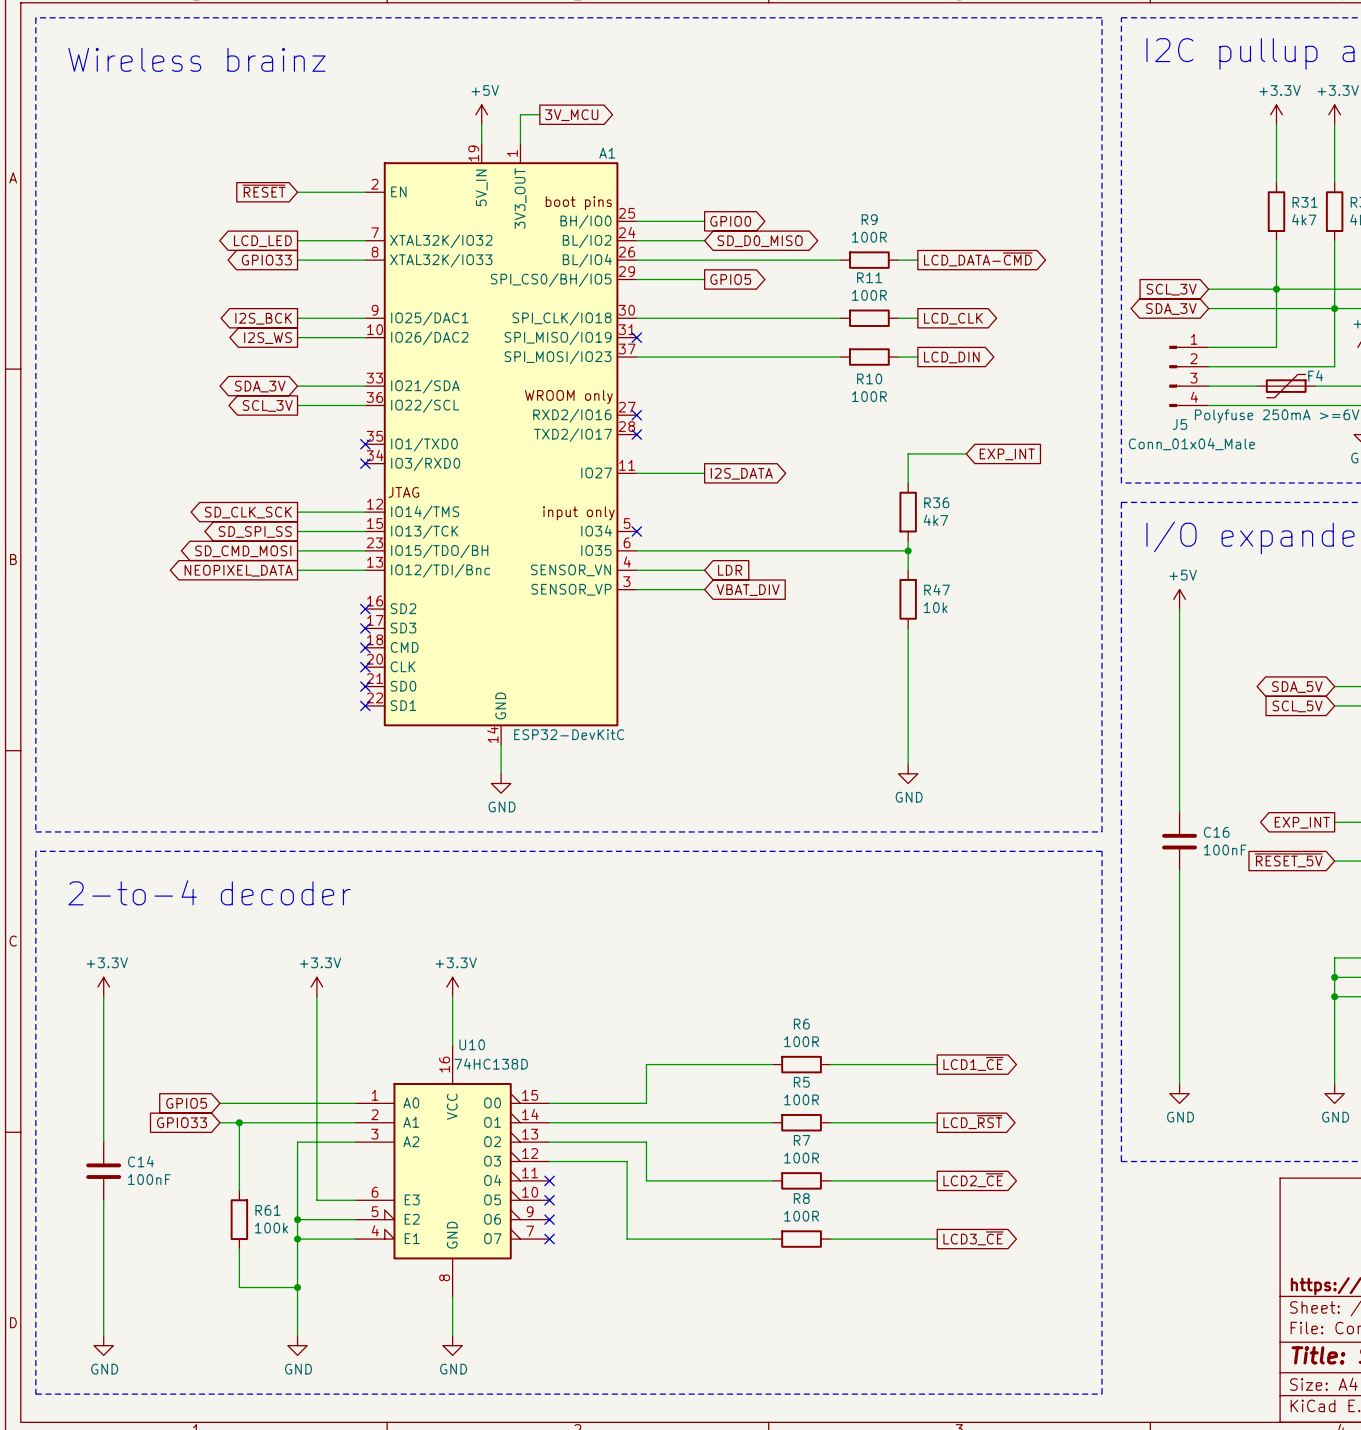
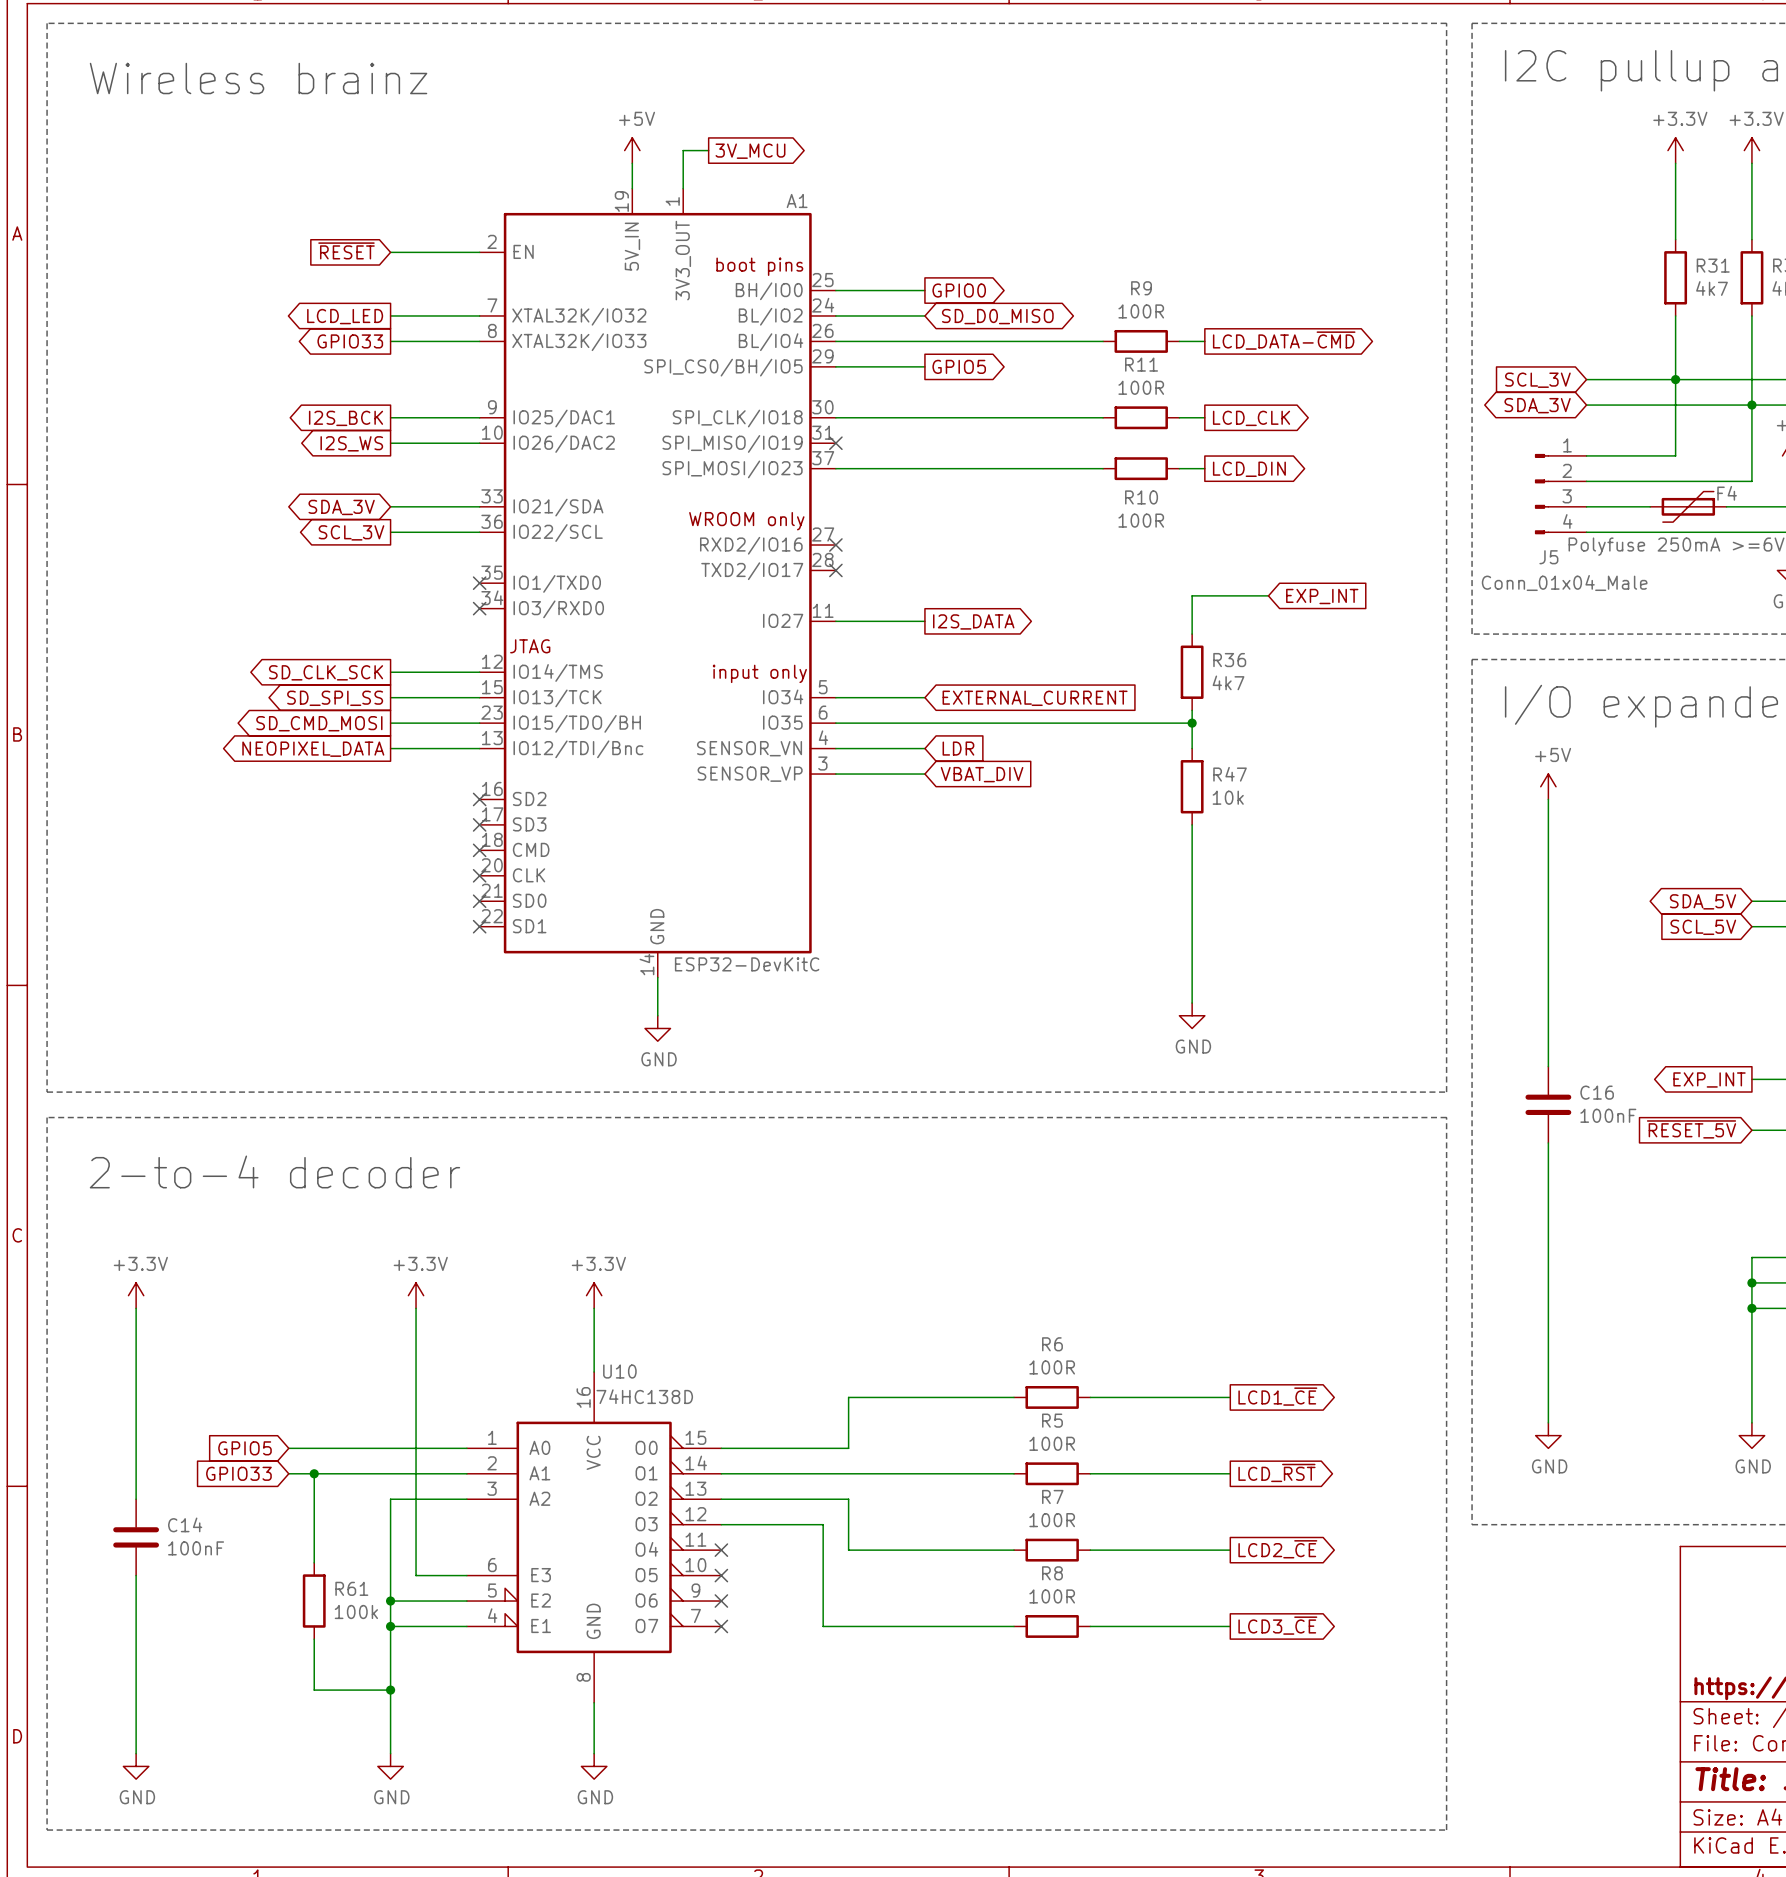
wire: none -> (835, 697) (924, 697)
no-connect mark: (636, 531) -> none
global label: none -> EXTERNAL_CURRENT (1035, 698)

